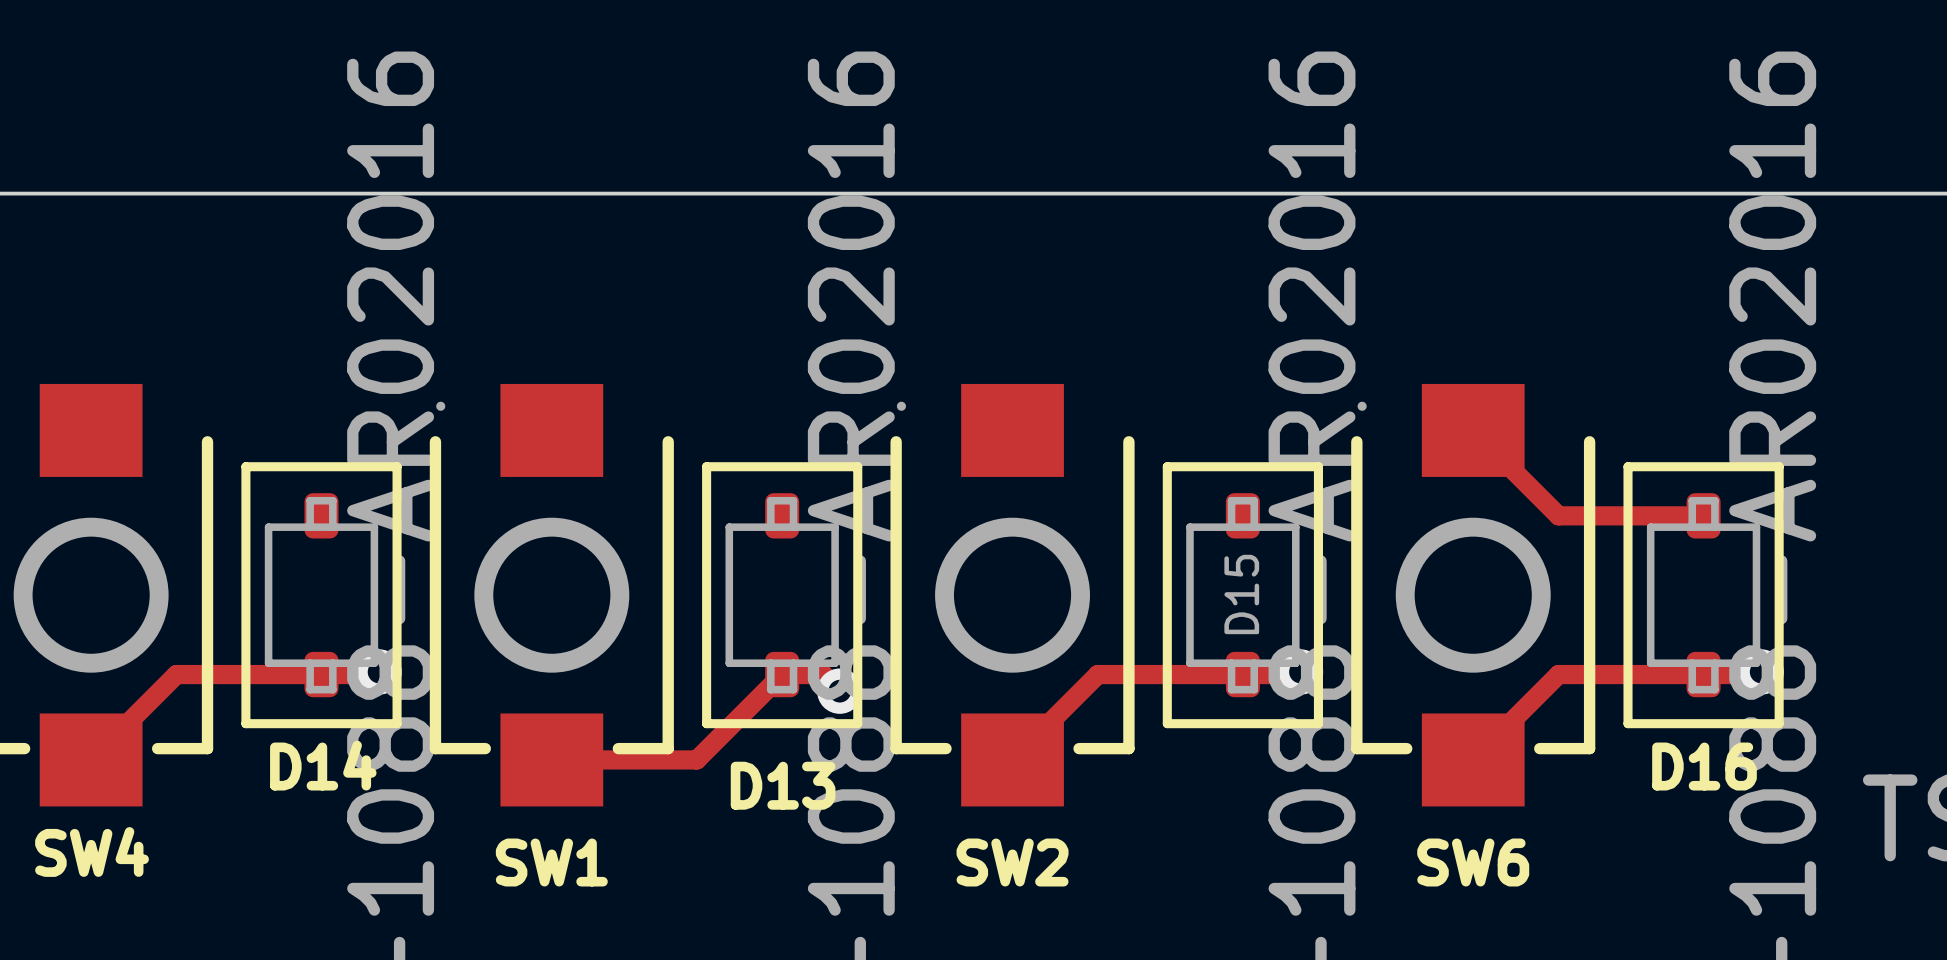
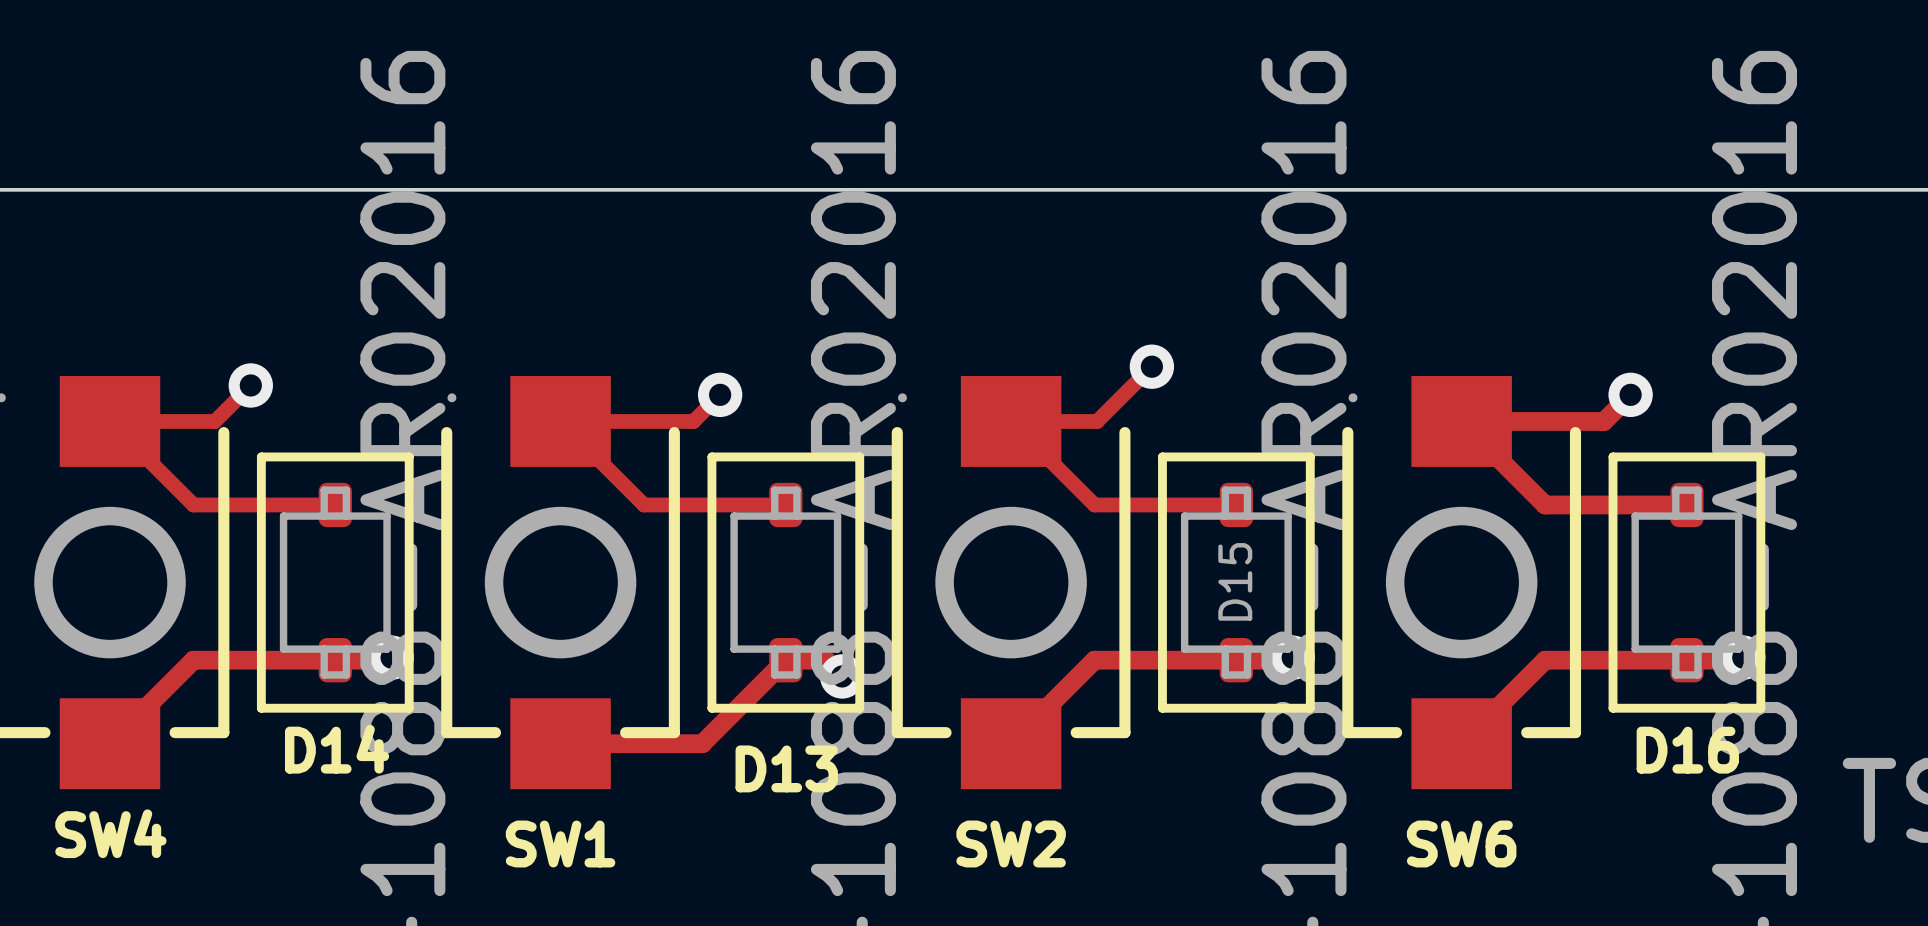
track: none -> (1151, 366) (1097, 421) (1011, 421) (1094, 504) (1236, 504)
via: none -> (1151, 366)
track: none -> (250, 385) (214, 421) (110, 421) (193, 504) (335, 504)
via: none -> (250, 385)
track: none -> (720, 394) (693, 421) (560, 421) (644, 504) (785, 504)
via: none -> (720, 394)
track: none -> (1630, 394) (1604, 421) (1461, 421)
via: none -> (1630, 394)

